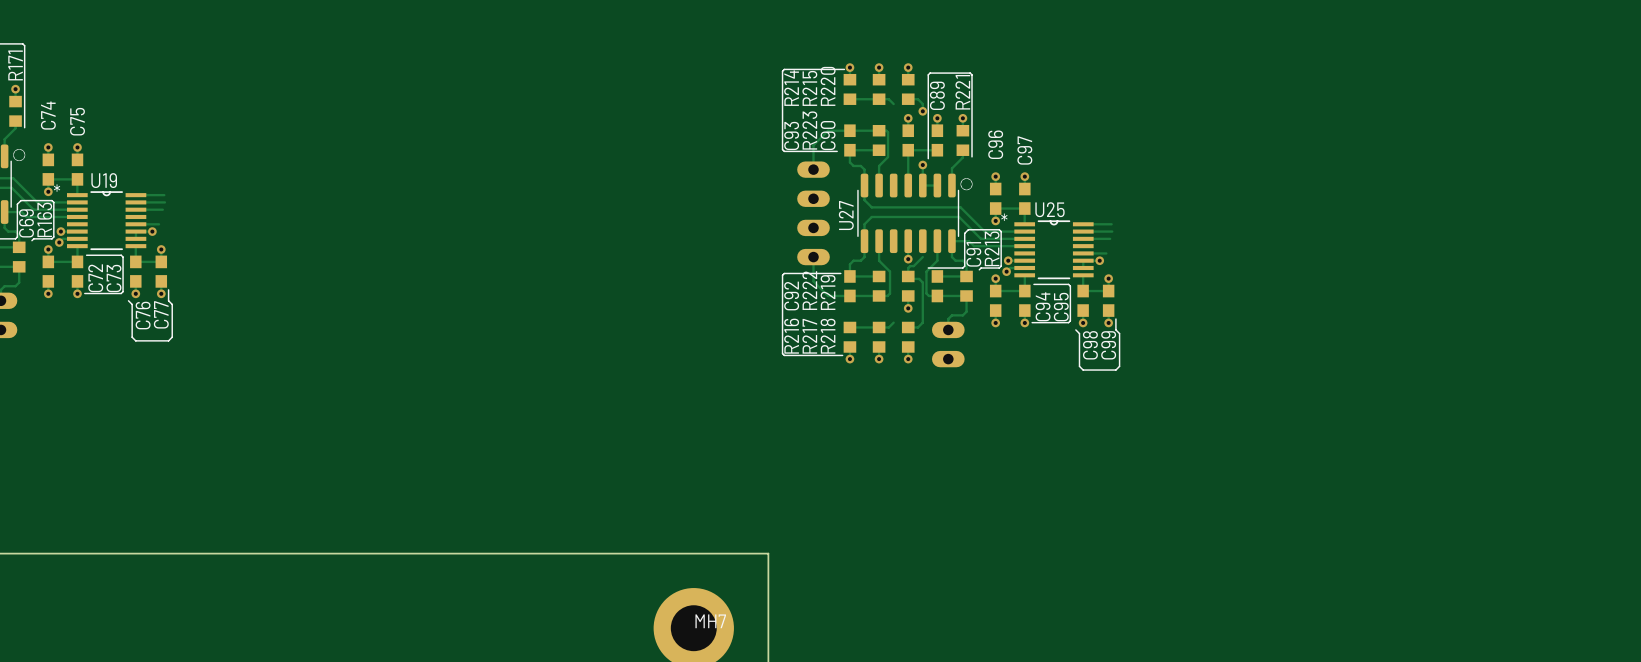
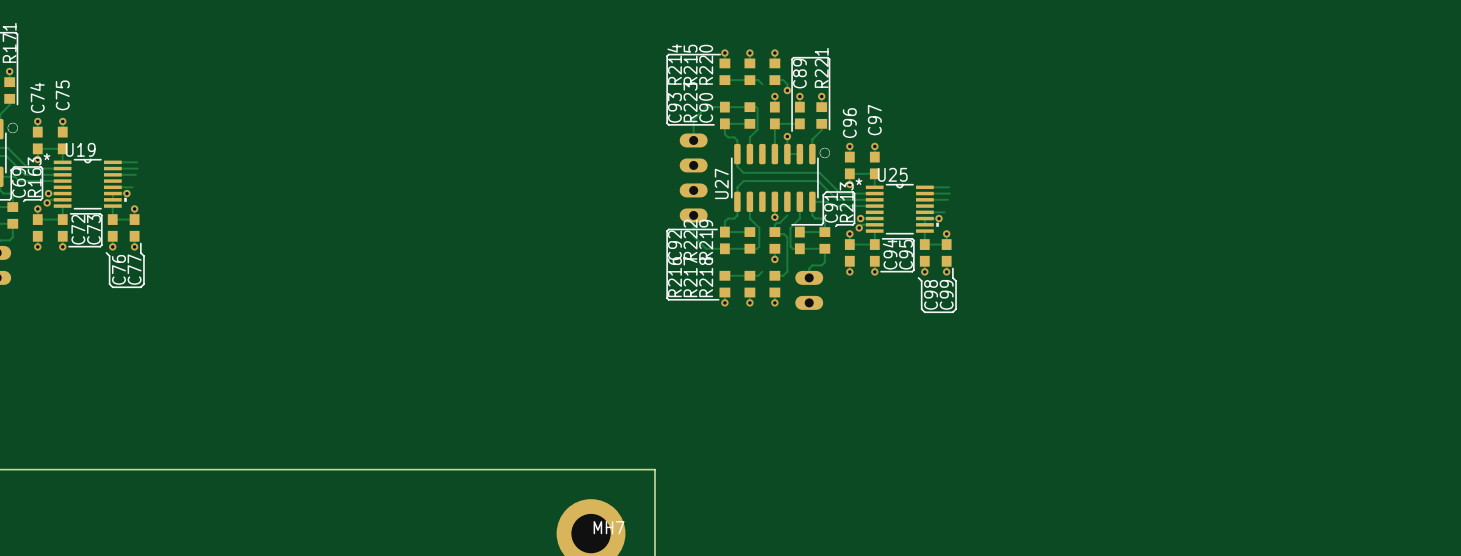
U19 footprint: [67, 190, 147, 251] -> [53, 158, 127, 210]
U25 footprint: [1014, 220, 1094, 280] -> [865, 183, 939, 235]

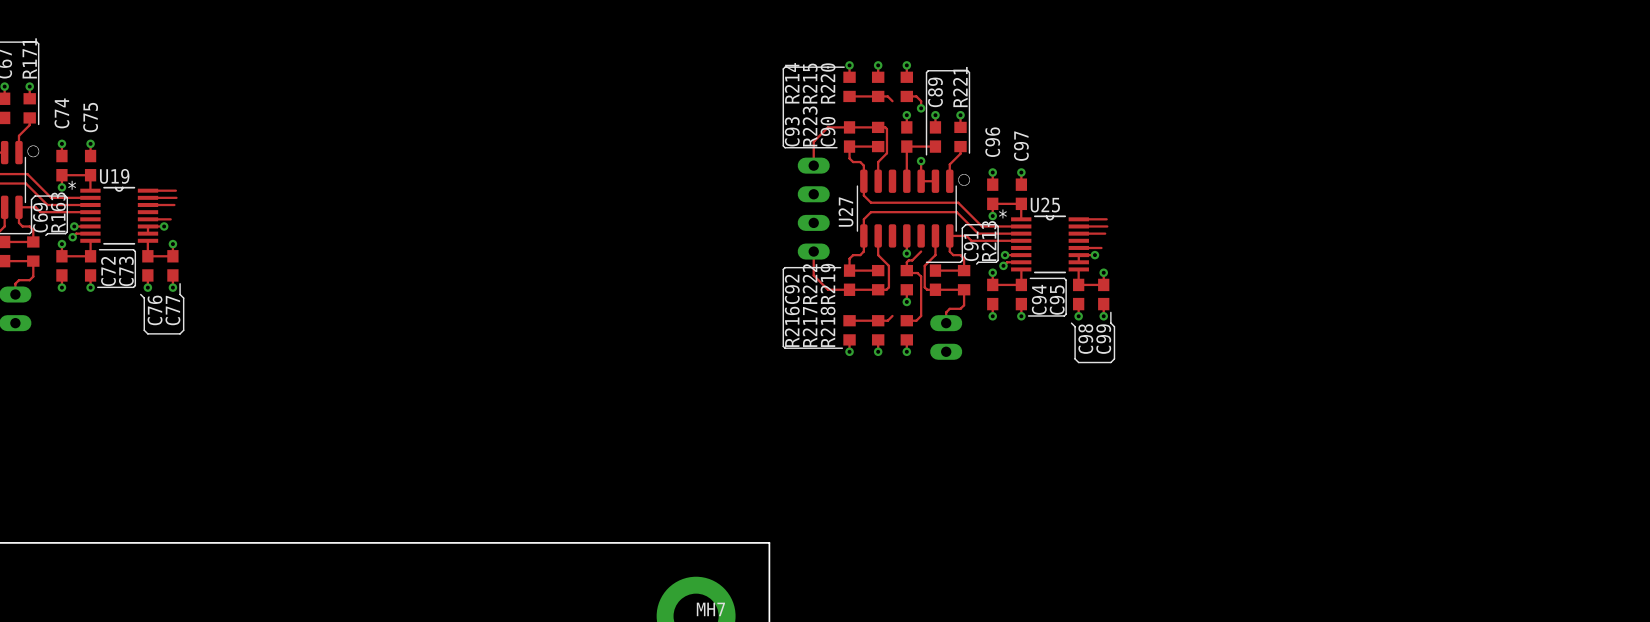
U19 footprint: [53, 158, 127, 210] -> [80, 186, 159, 245]
U25 footprint: [865, 183, 939, 235] -> [1011, 215, 1089, 274]

